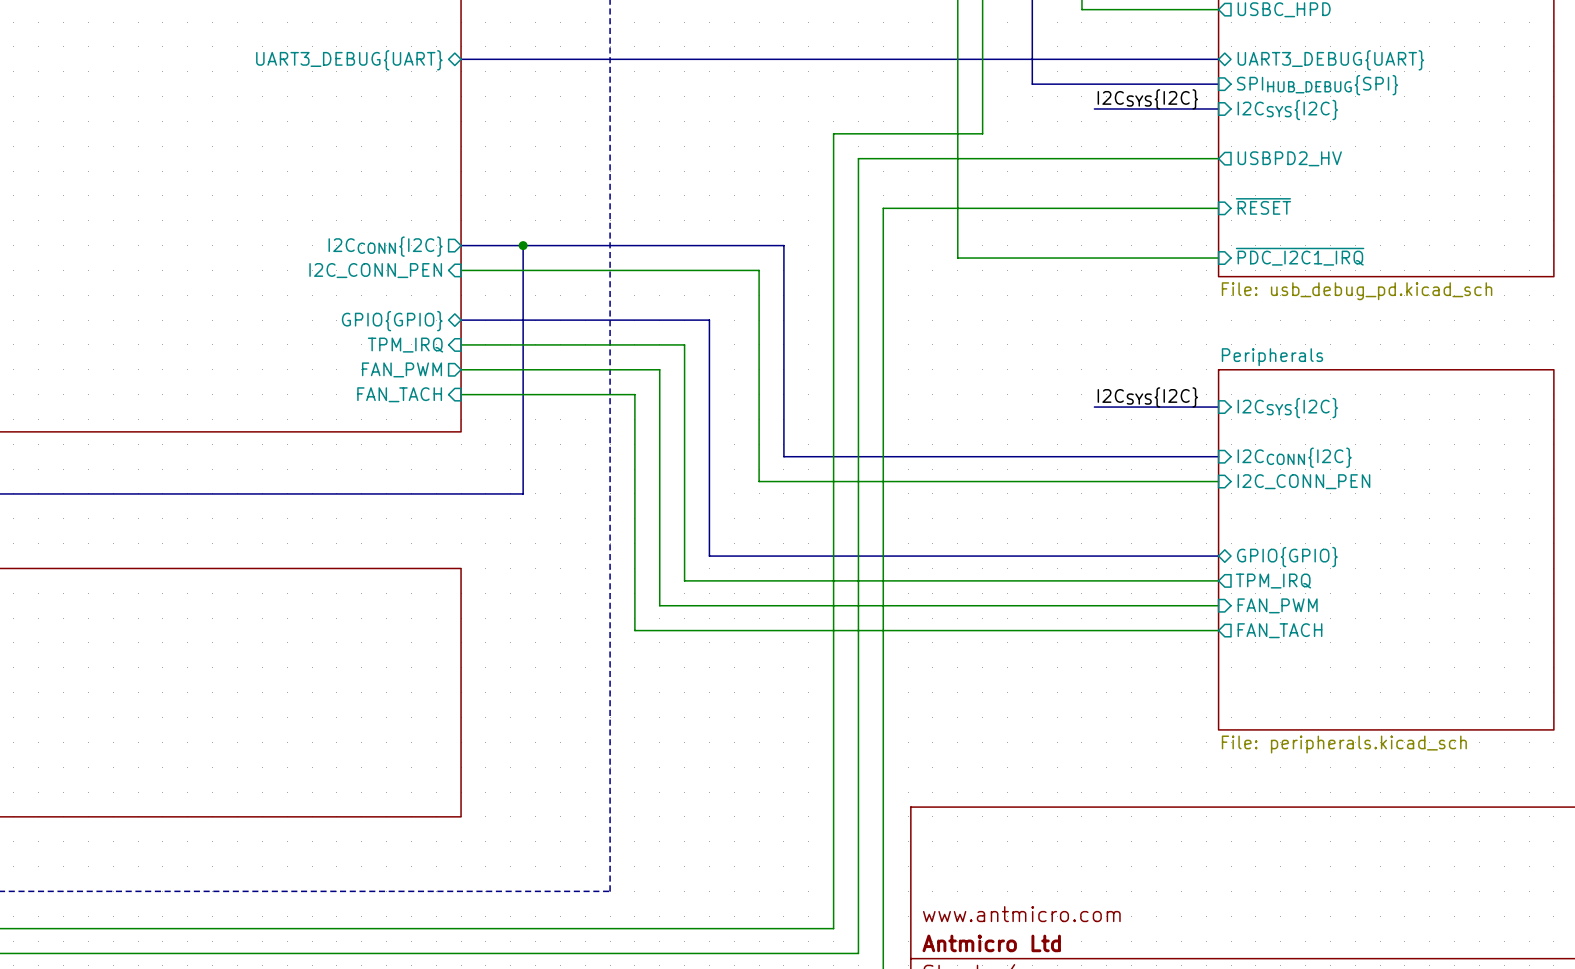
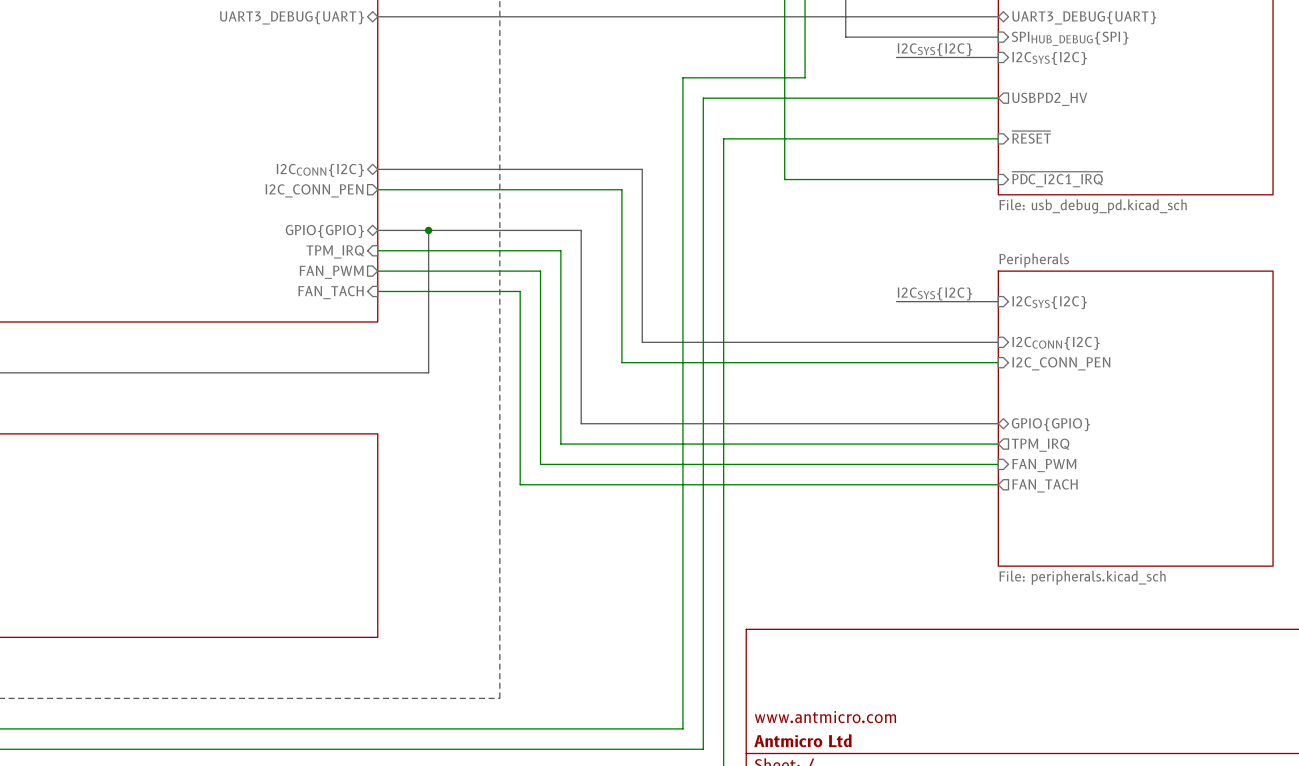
bus: (523, 245) (523, 320) -> none
junction: (523, 245) -> none
sheet pin shape: output (385, 246) -> bidirectional (320, 170)
sheet pin shape: input (375, 270) -> output (314, 190)
junction: none -> (428, 230)

